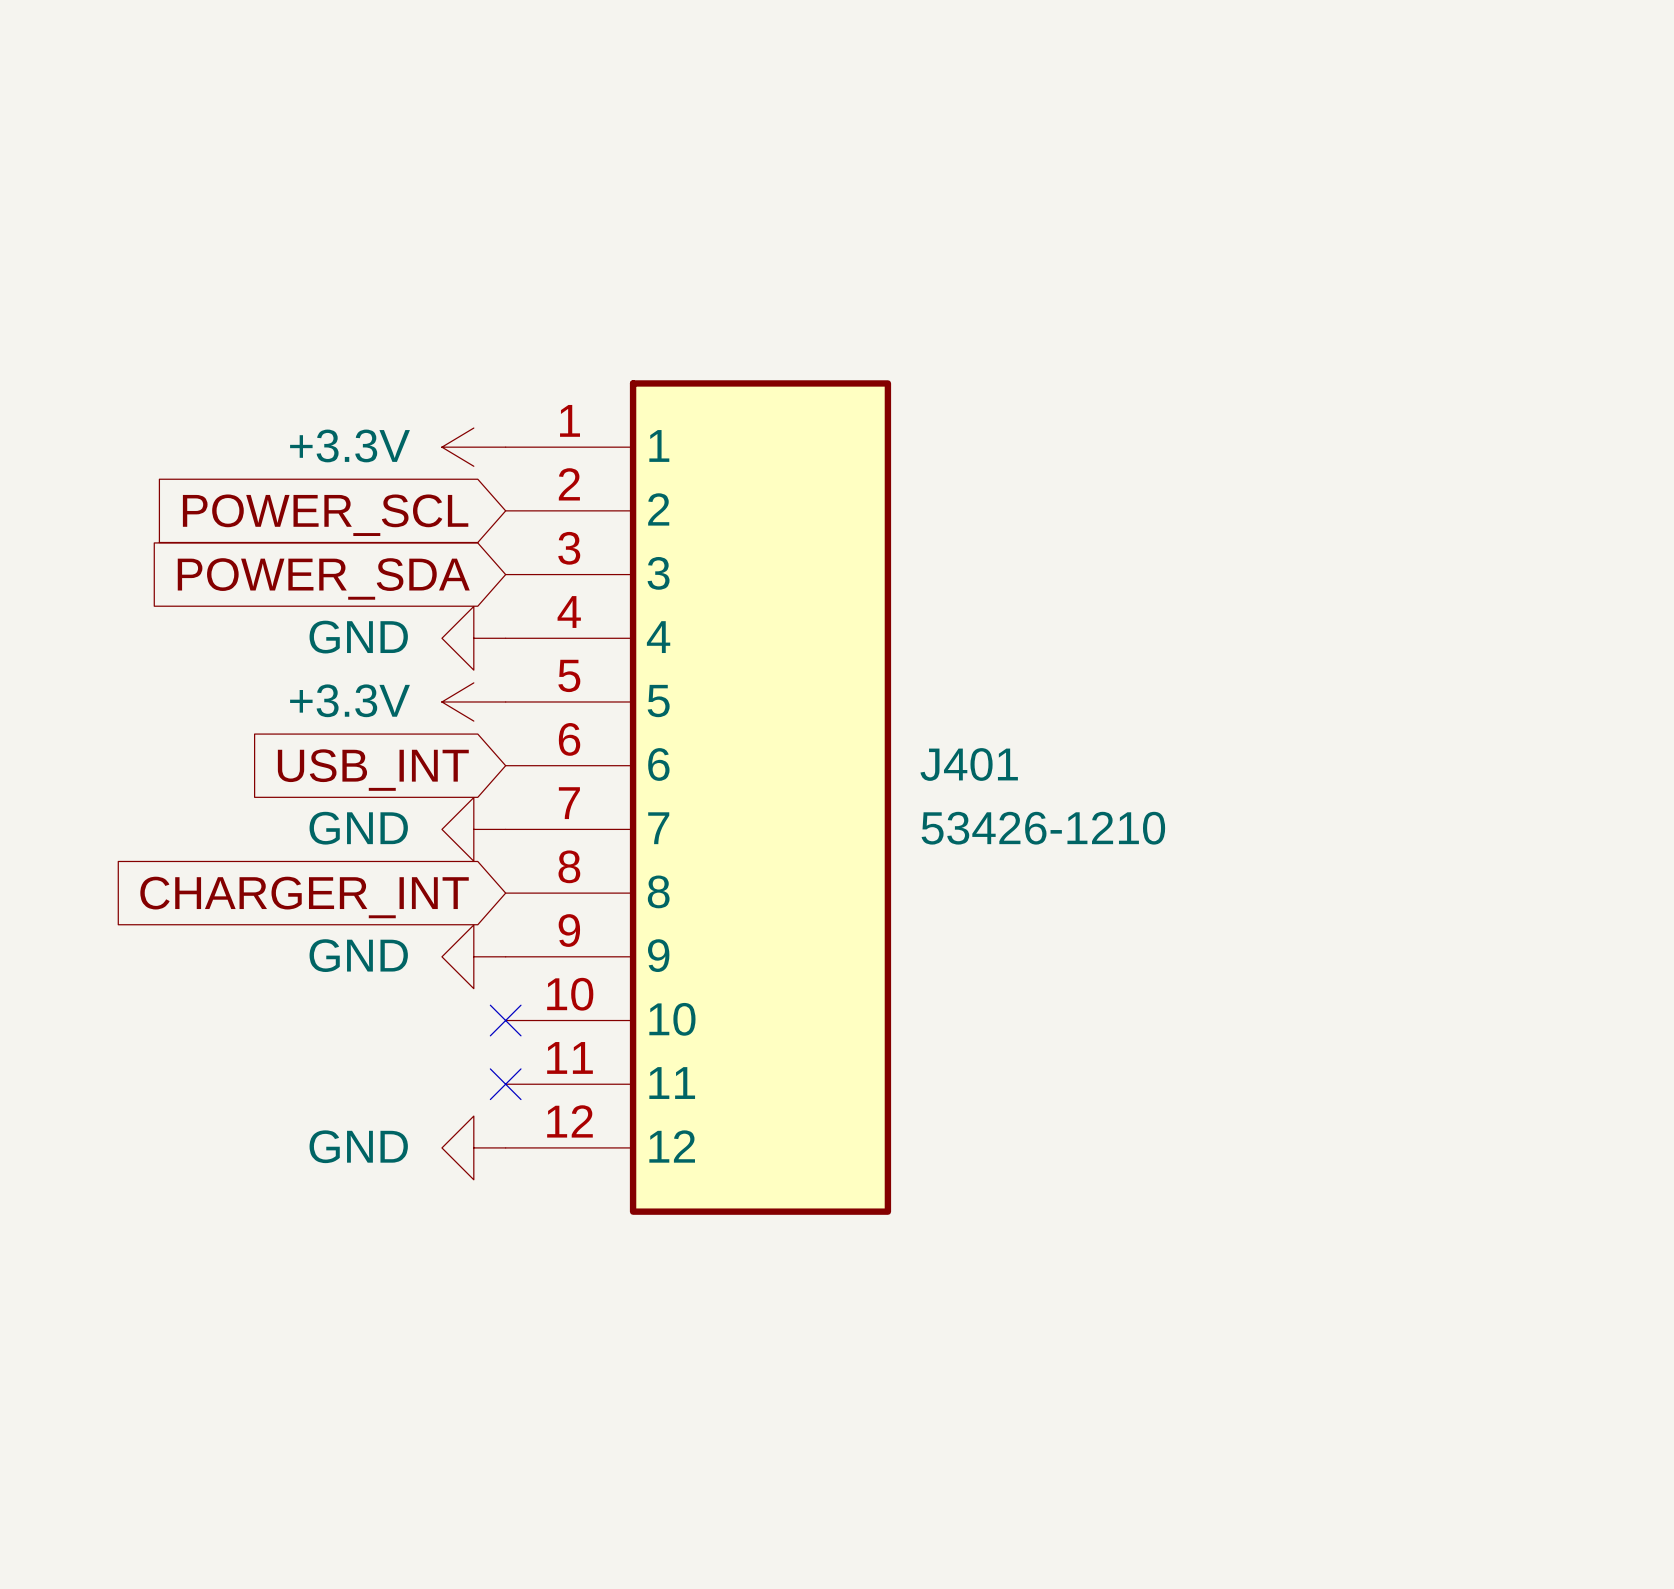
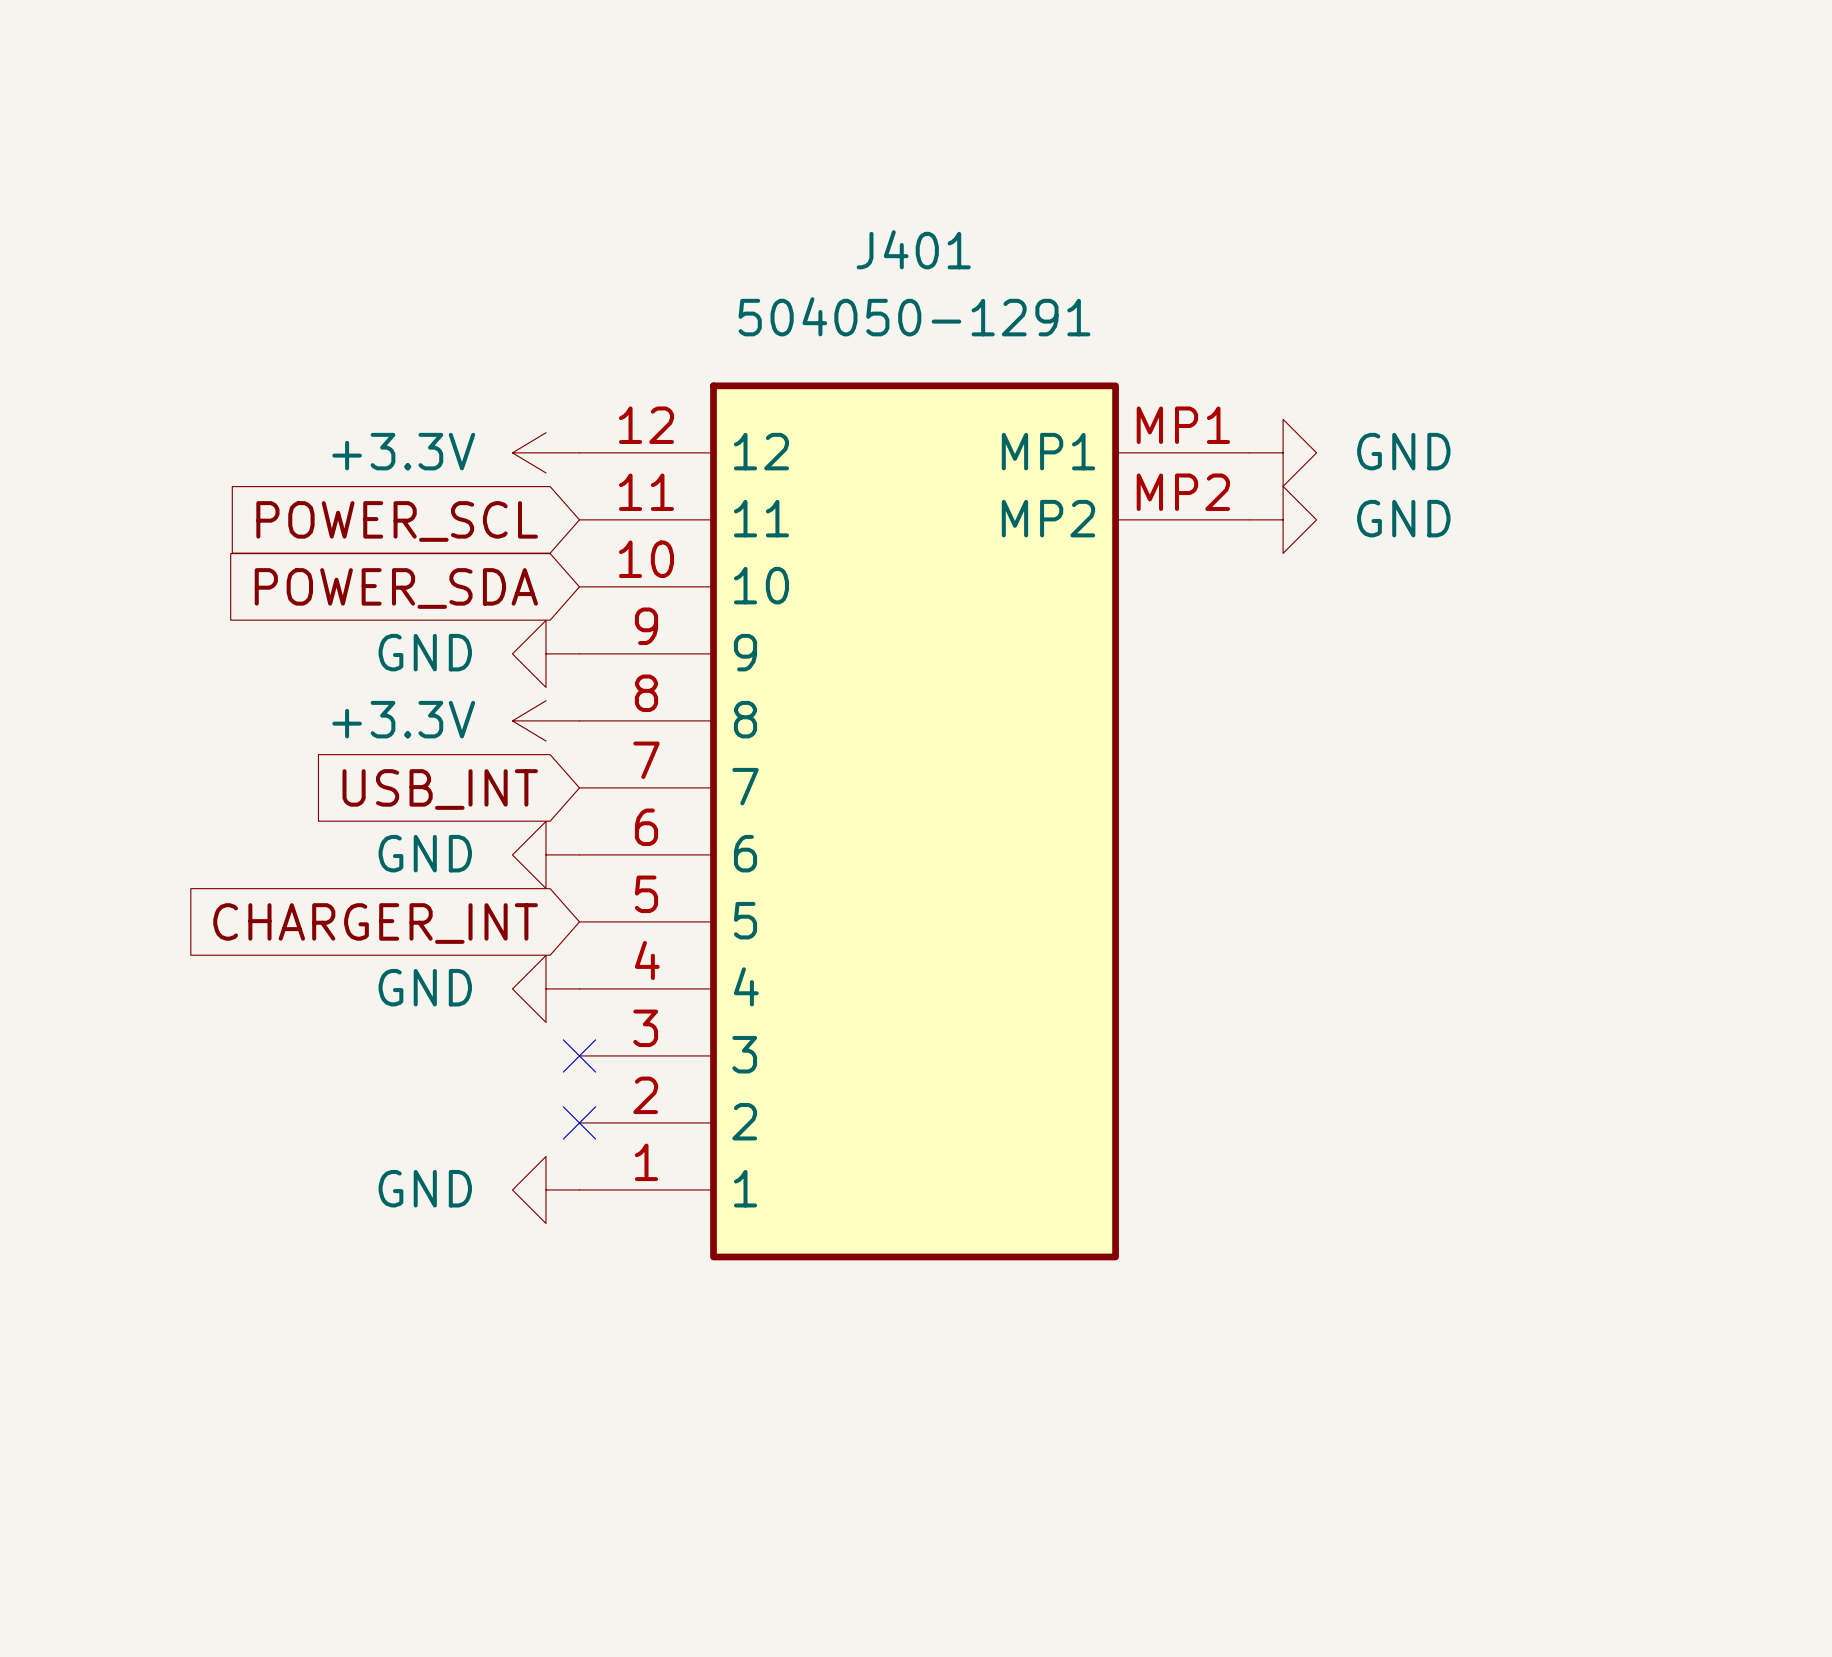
J401 symbol: [505, 380, 892, 1215] -> [579, 382, 1250, 1261]
power symbol: none -> GND (1283, 452)
power symbol: none -> GND (1283, 519)
J401 name position: J401 (969, 764) -> J401 (913, 249)
J401 value: 53426-1210 (1043, 828) -> 504050-1291 (914, 316)

